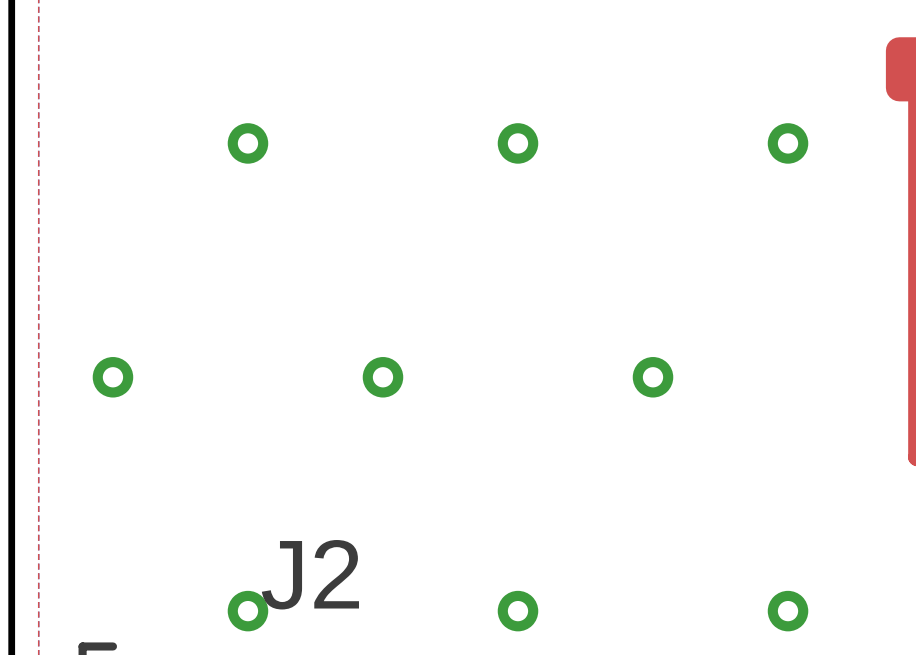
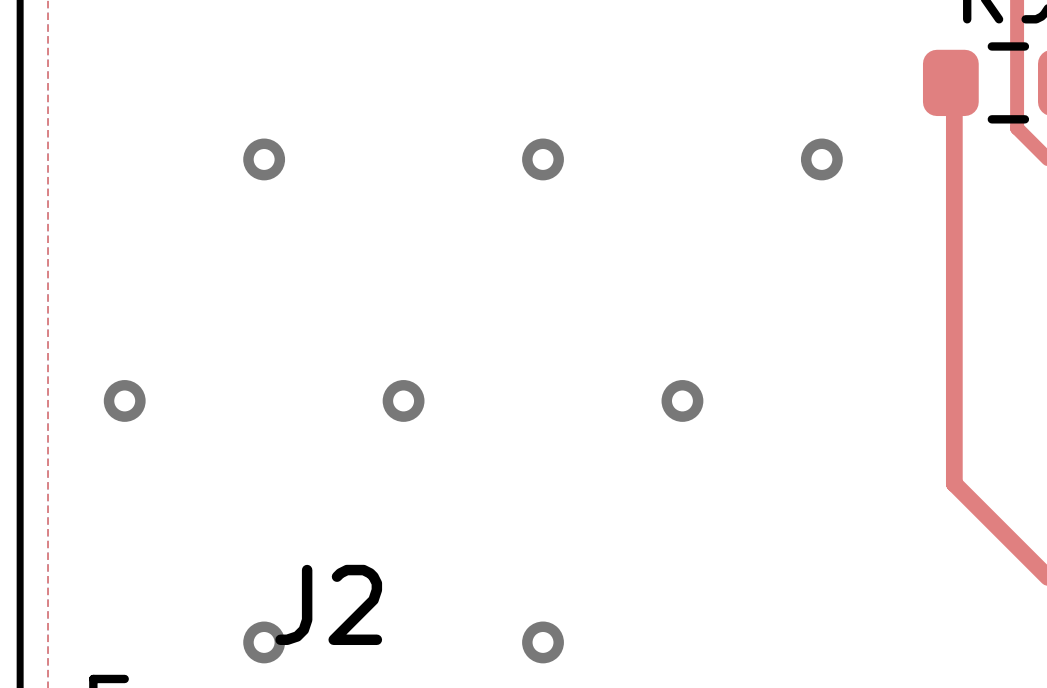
via: (788, 611) -> none

